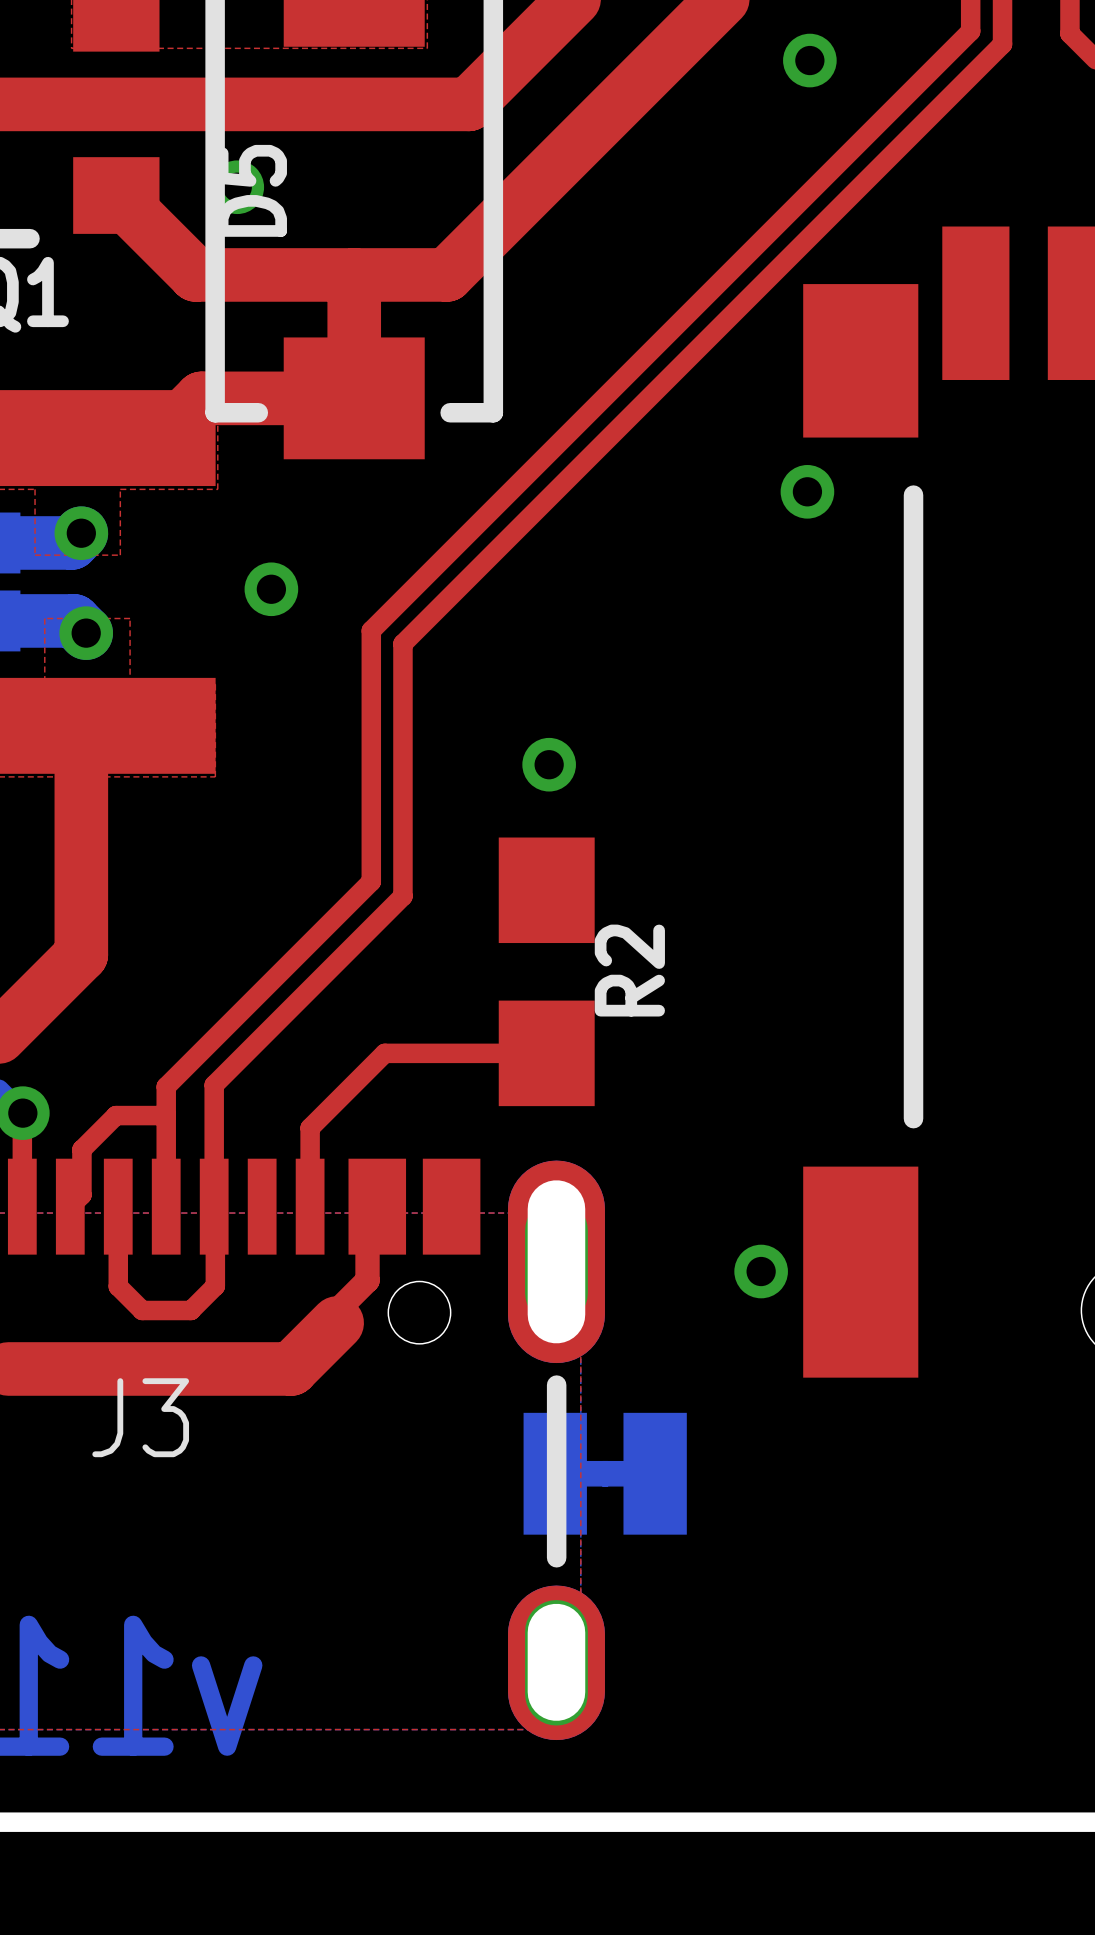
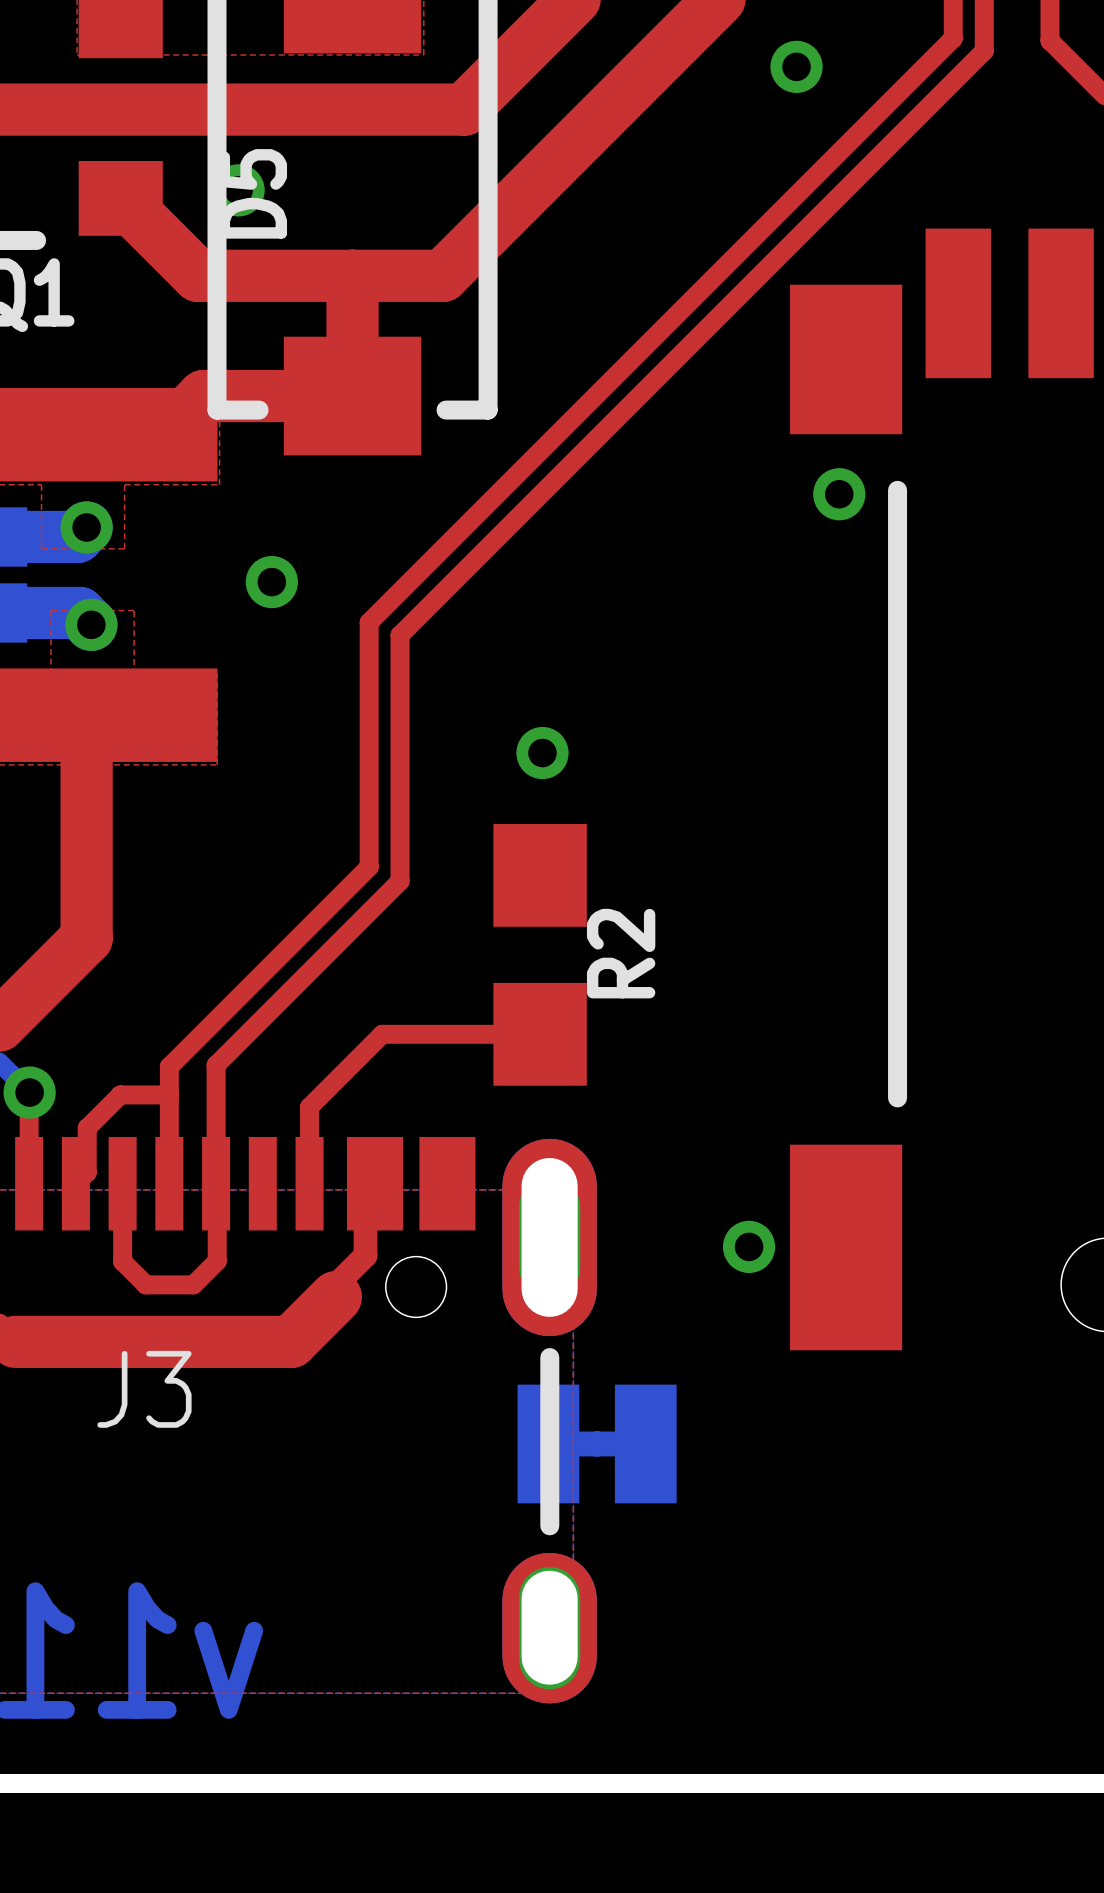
via position: (807, 491) -> (839, 494)

